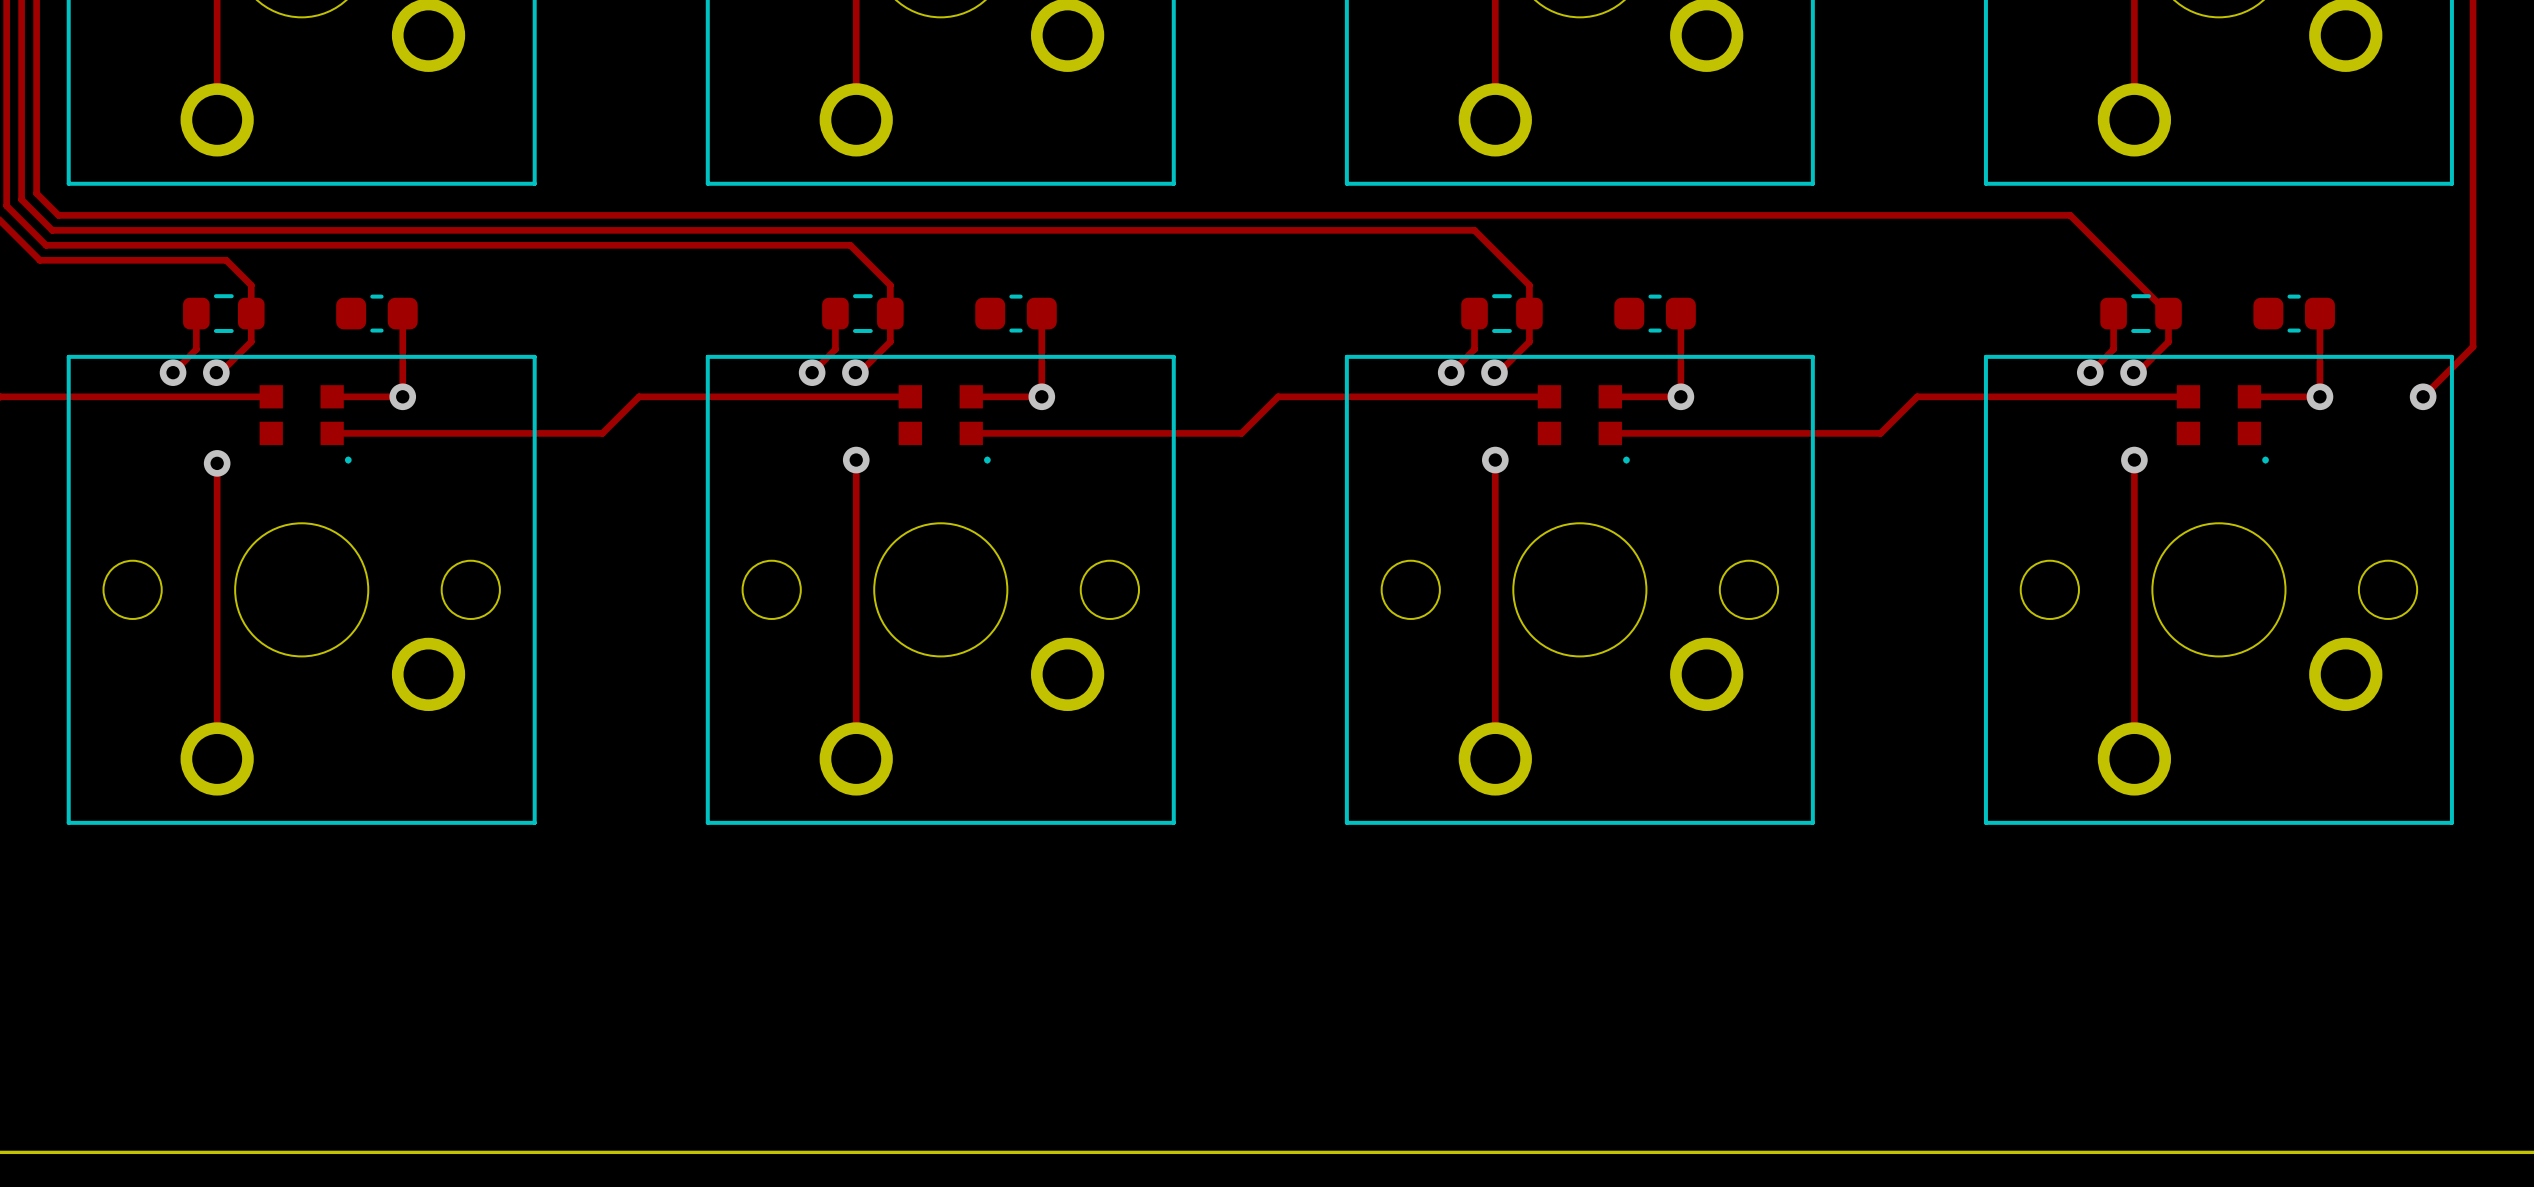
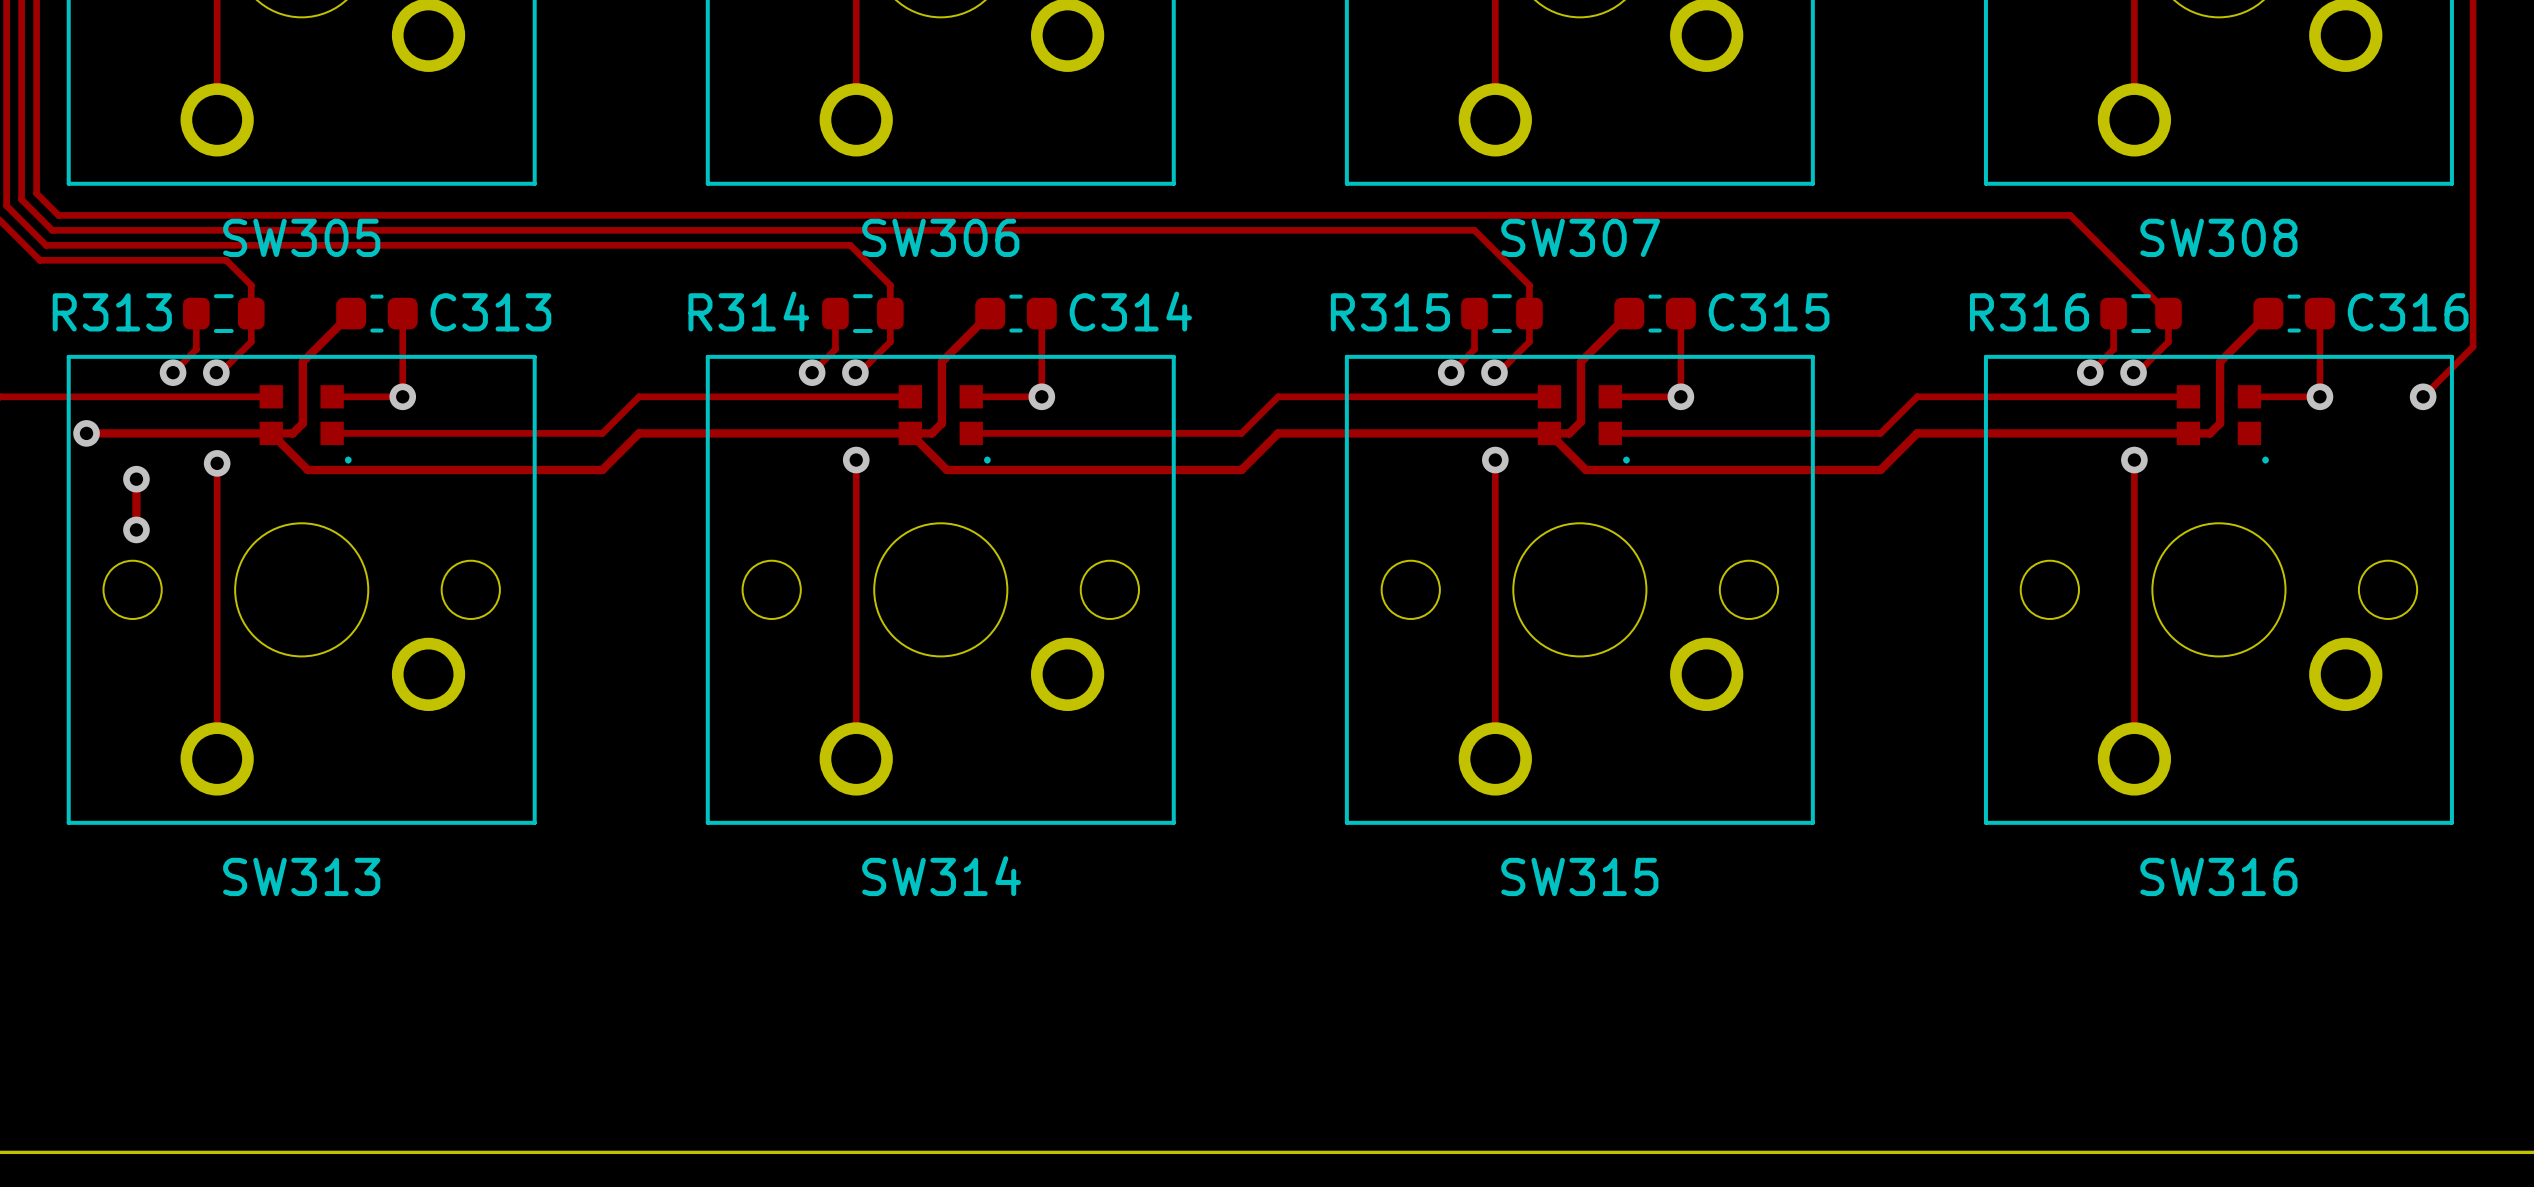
SW305 name: none -> SW305 (301, 237)
SW306 name: none -> SW306 (940, 237)
SW307 name: none -> SW307 (1580, 237)
SW308 name: none -> SW308 (2218, 237)
R314 name: none -> R314 (748, 311)
C314 name: none -> C314 (1130, 311)
R313 name: none -> R313 (112, 312)
C313 name: none -> C313 (490, 312)
R315 name: none -> R315 (1390, 312)
C315 name: none -> C315 (1769, 312)
R316 name: none -> R316 (2029, 312)
C316 name: none -> C316 (2408, 312)
track: none -> (351, 313) (302, 361) (302, 423) (292, 433) (86, 433)
track: none -> (990, 313) (941, 361) (941, 423) (931, 433) (639, 433) (602, 470) (307, 470) (271, 433)
track: none -> (1629, 313) (1581, 361) (1581, 421) (1569, 433) (1278, 433) (1241, 470) (946, 470) (910, 433)
track: none -> (2268, 313) (2220, 361) (2220, 423) (2210, 433) (1917, 433) (1880, 470) (1586, 470) (1549, 433)
via: none -> (86, 433)
track: none -> (136, 479) (136, 529)
via: none -> (136, 479)
via: none -> (136, 529)
SW313 name: none -> SW313 (301, 876)
SW314 name: none -> SW314 (941, 876)
SW315 name: none -> SW315 (1579, 876)
SW316 name: none -> SW316 (2218, 876)

